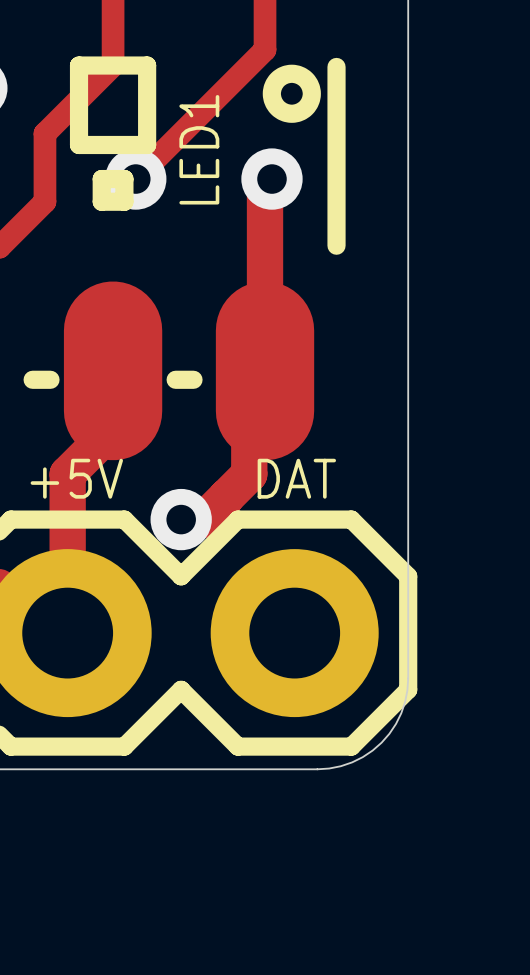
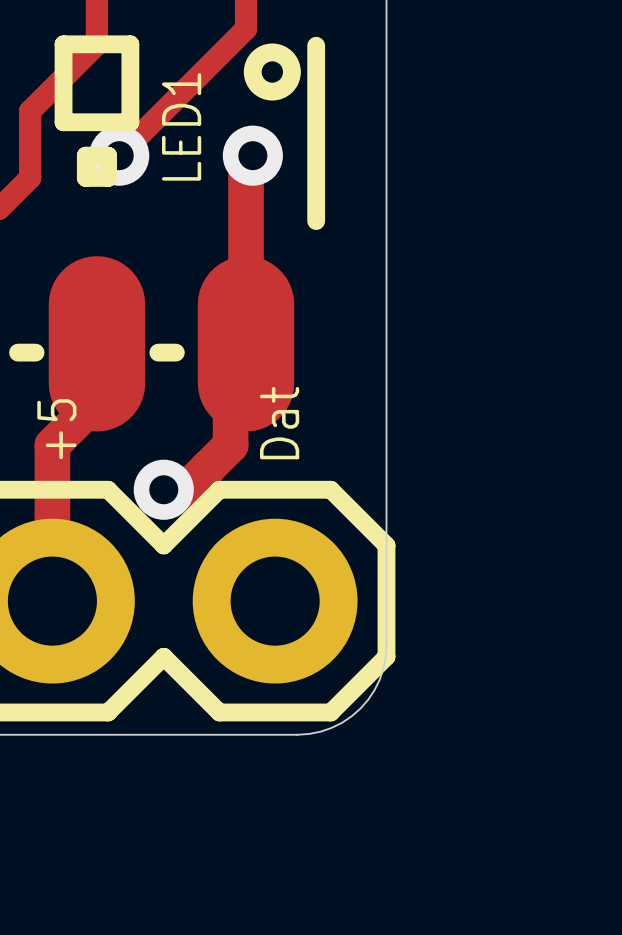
text: +5V (76, 478) -> +5 (56, 429)
text: DAT (296, 478) -> Dat (279, 423)

